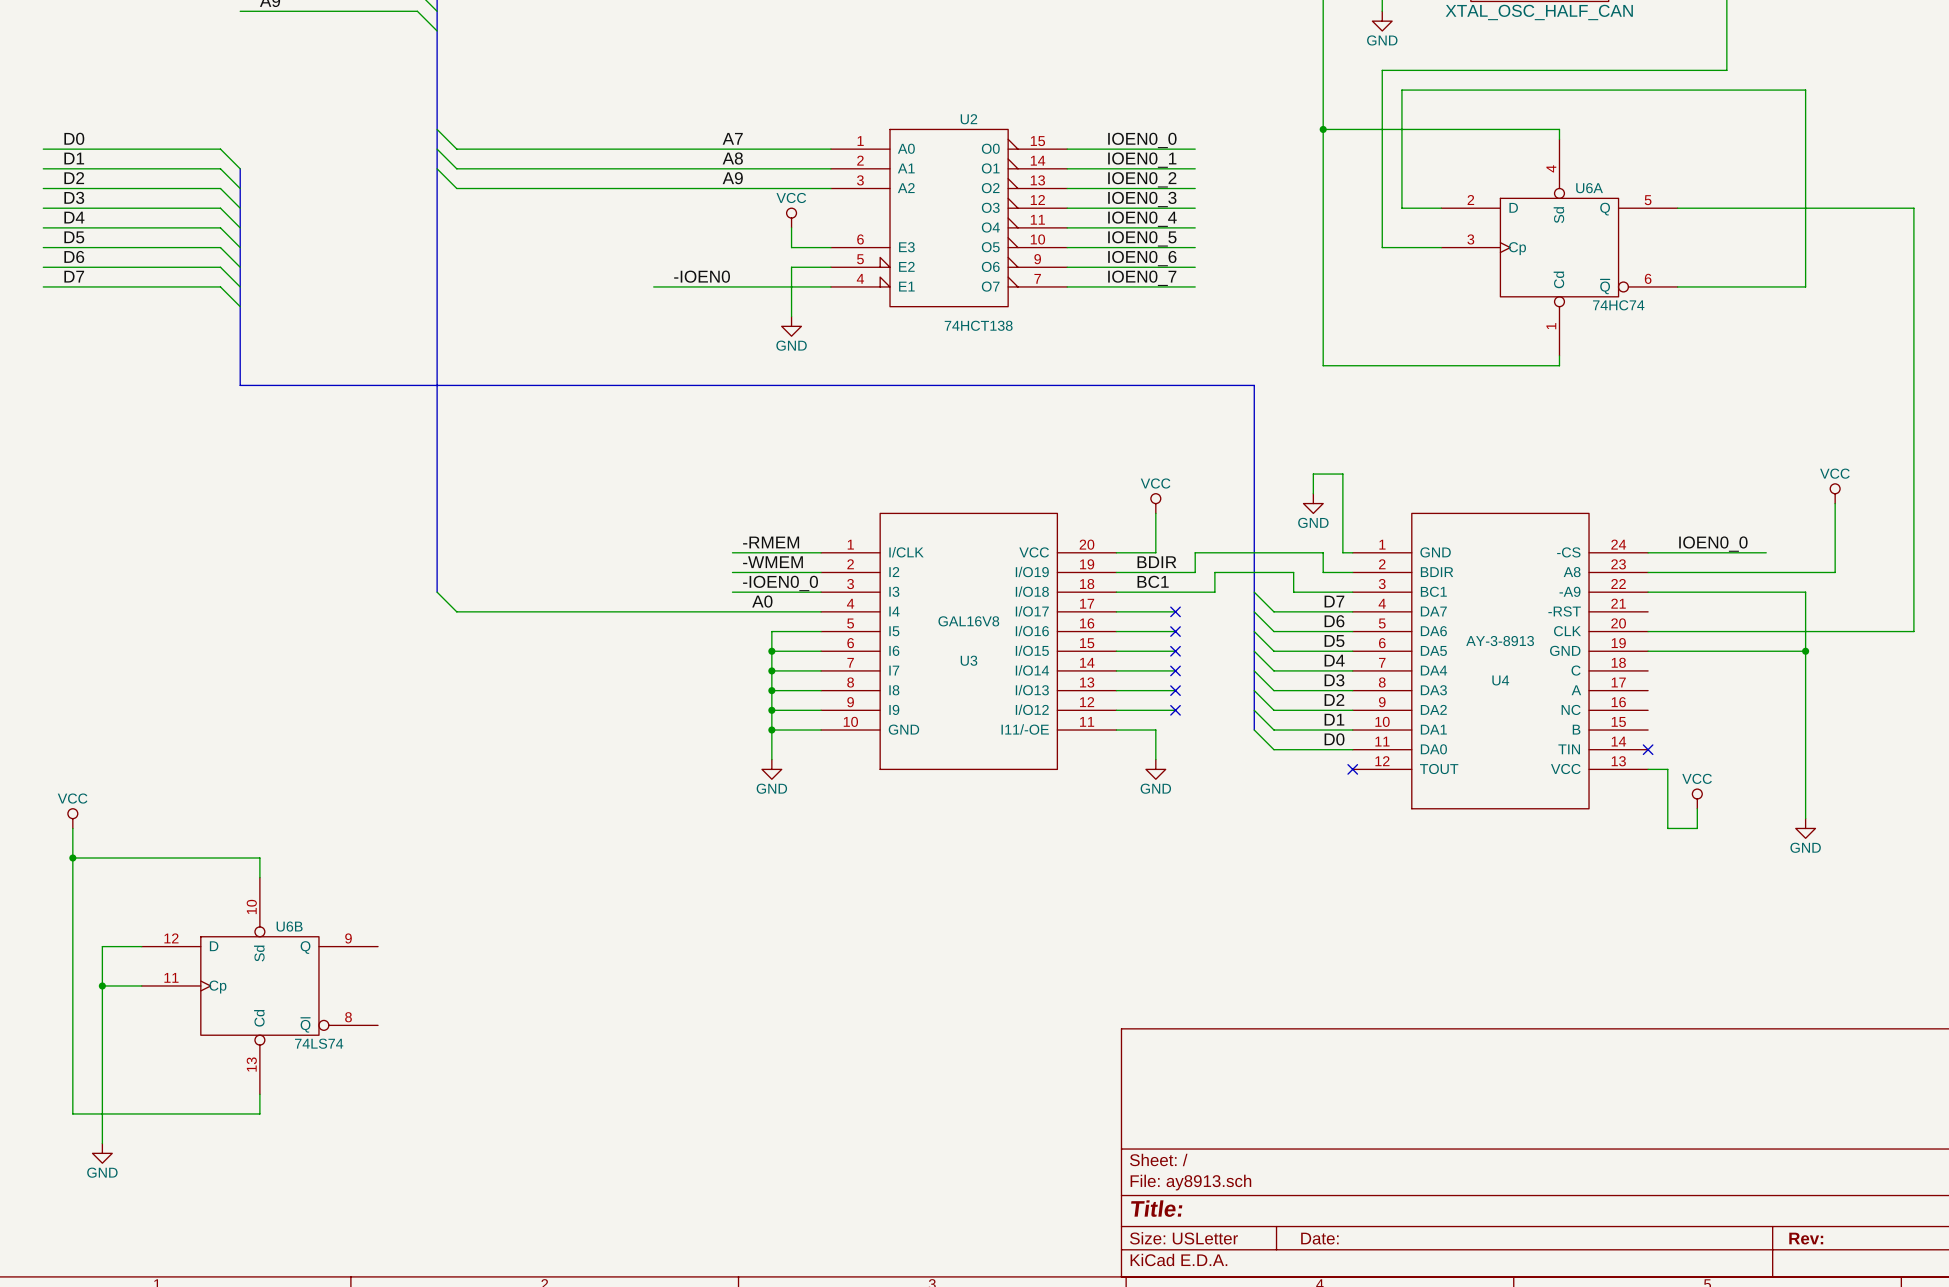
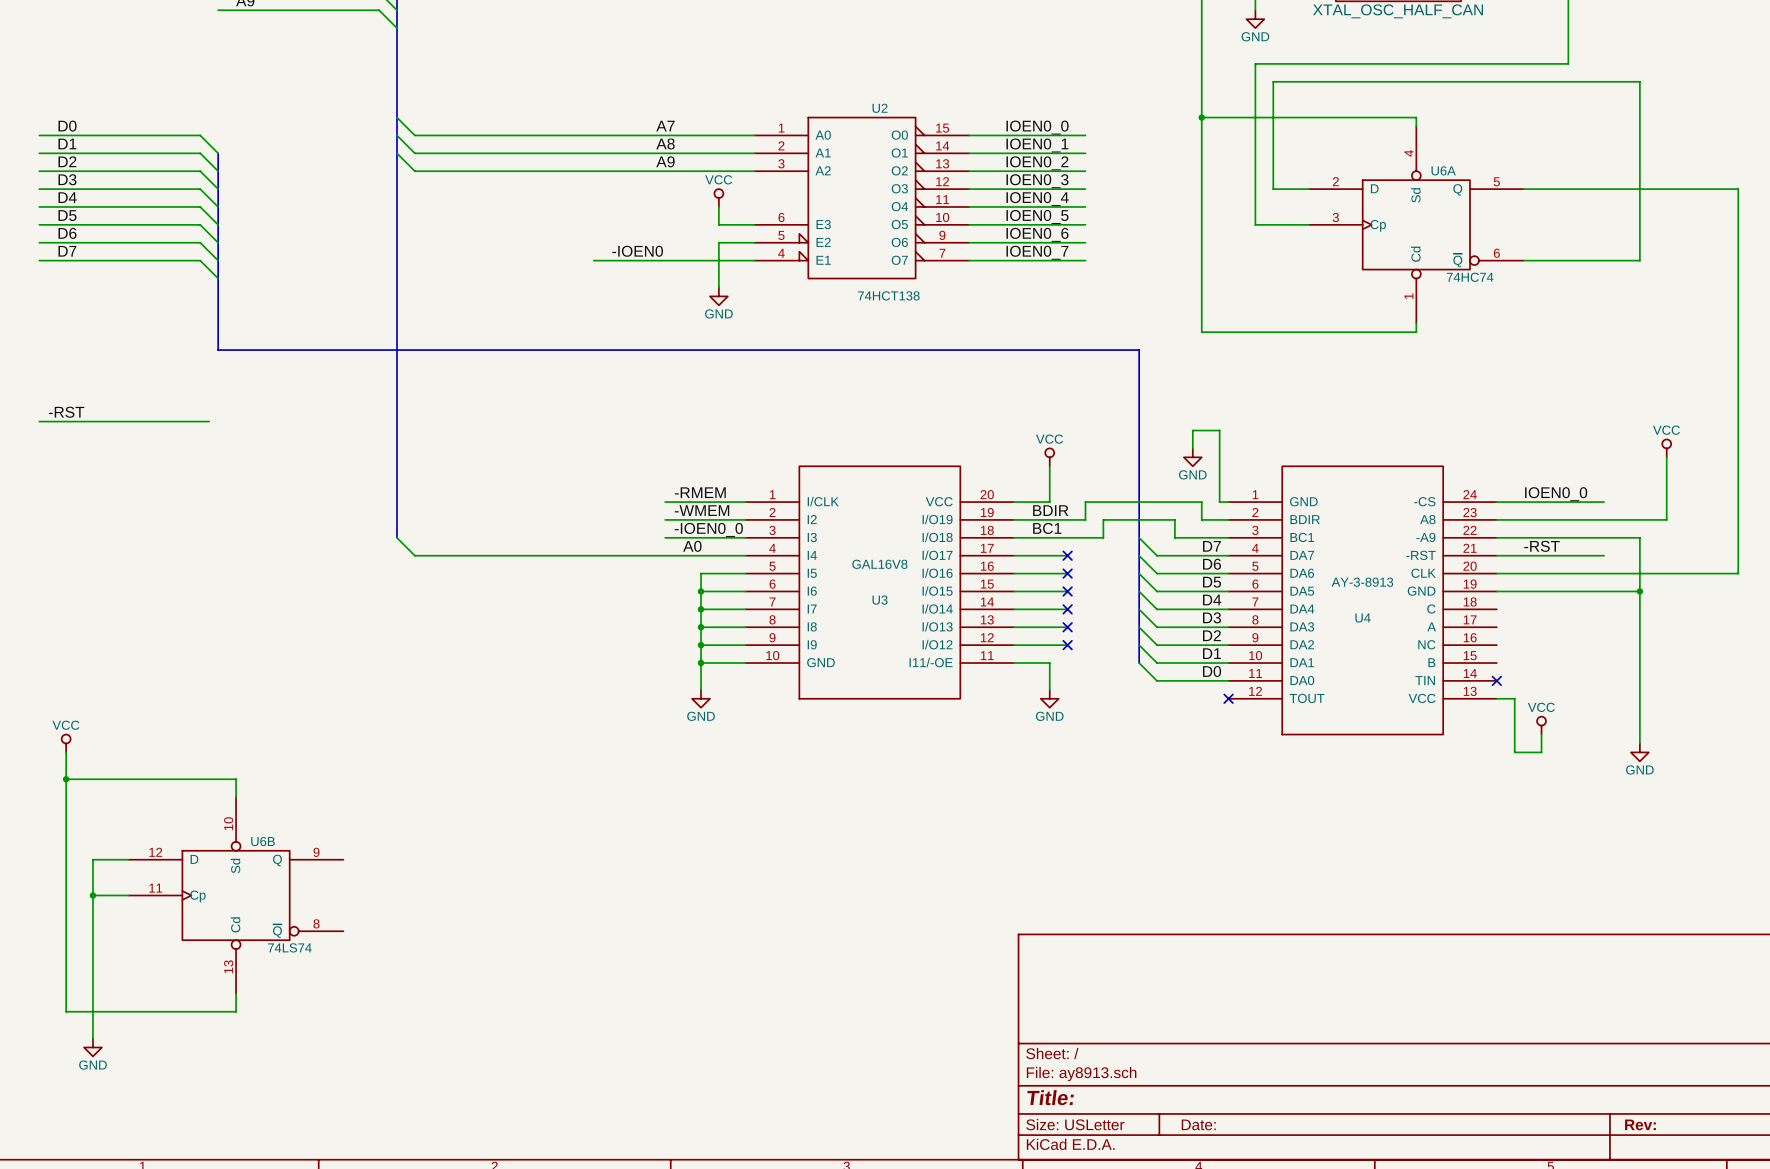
label: none -> -RST (66, 412)
wire: none -> (39, 421) (209, 421)
label: none -> -RST (1542, 546)
wire: none -> (1496, 555) (1604, 555)

